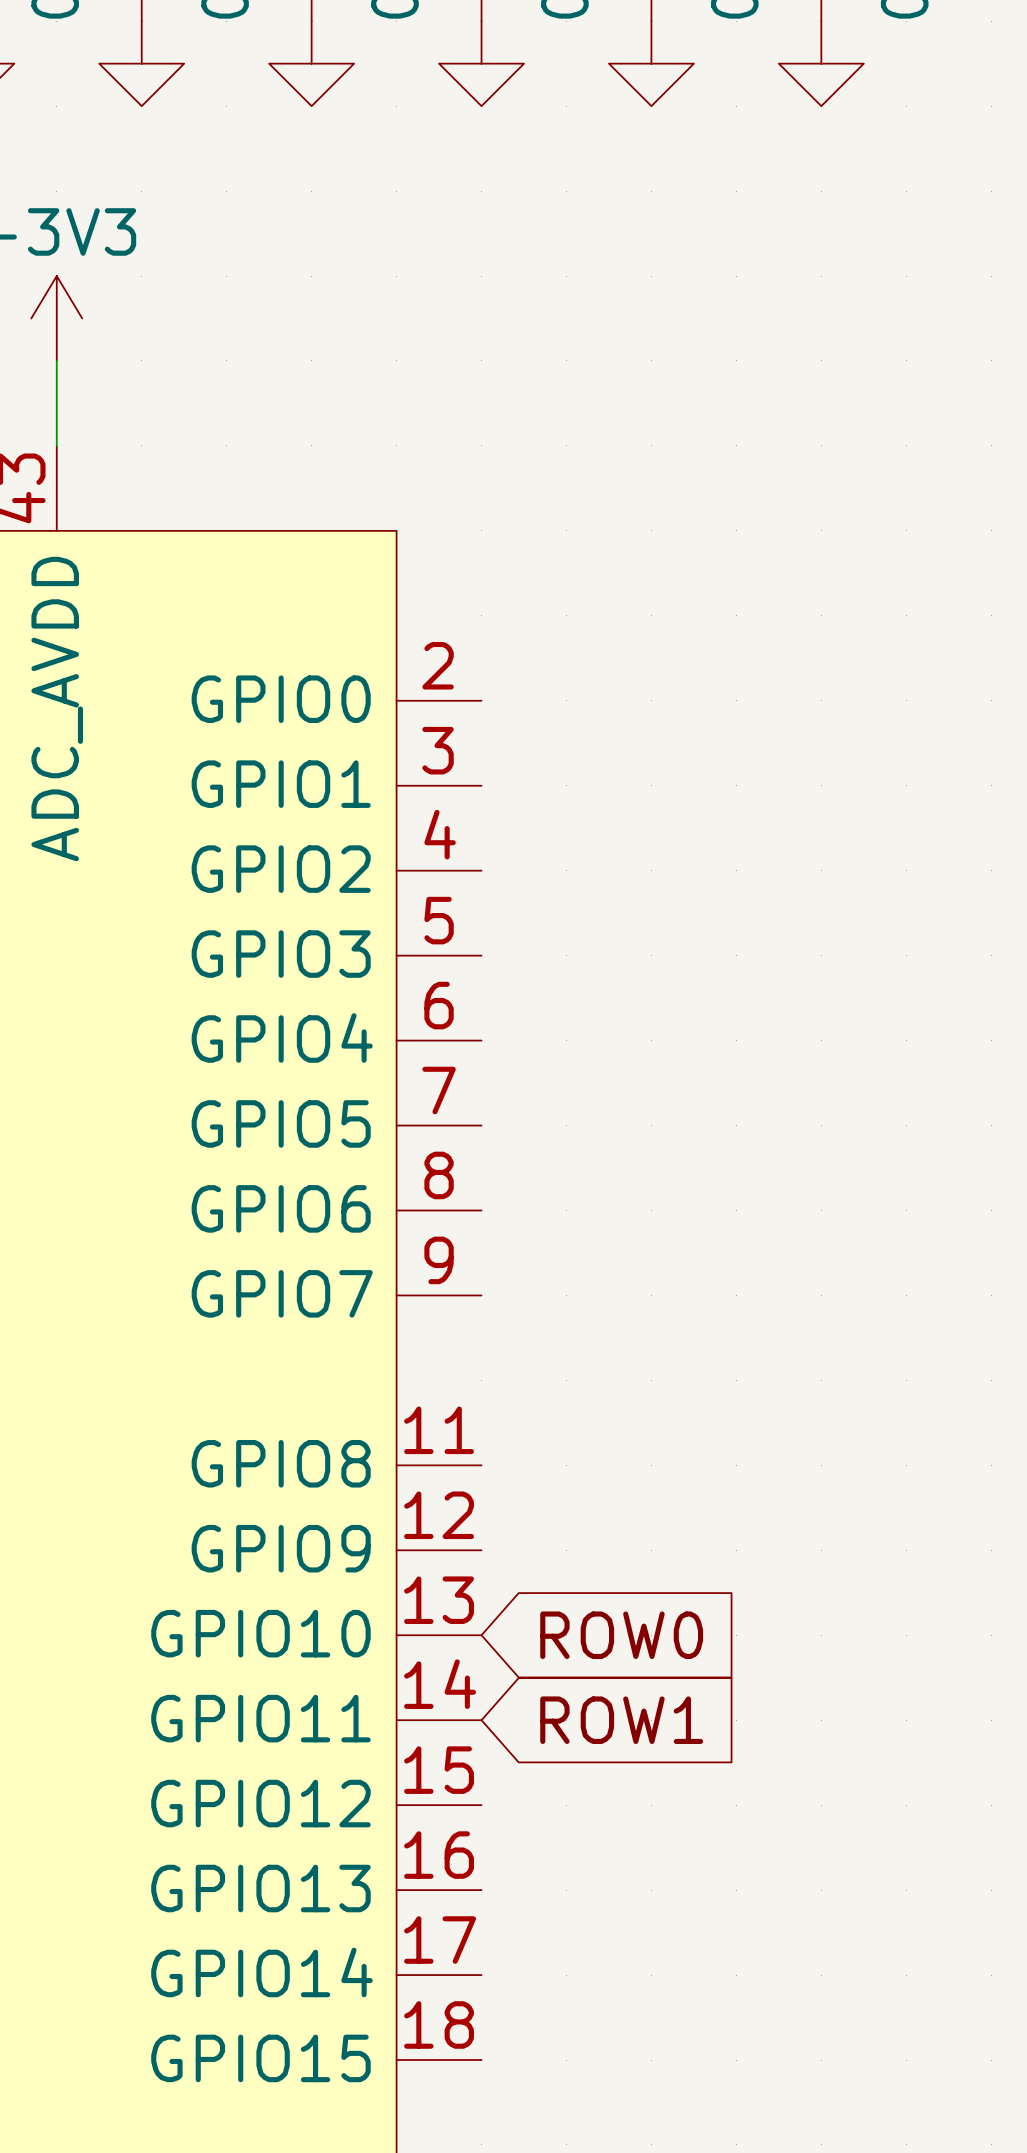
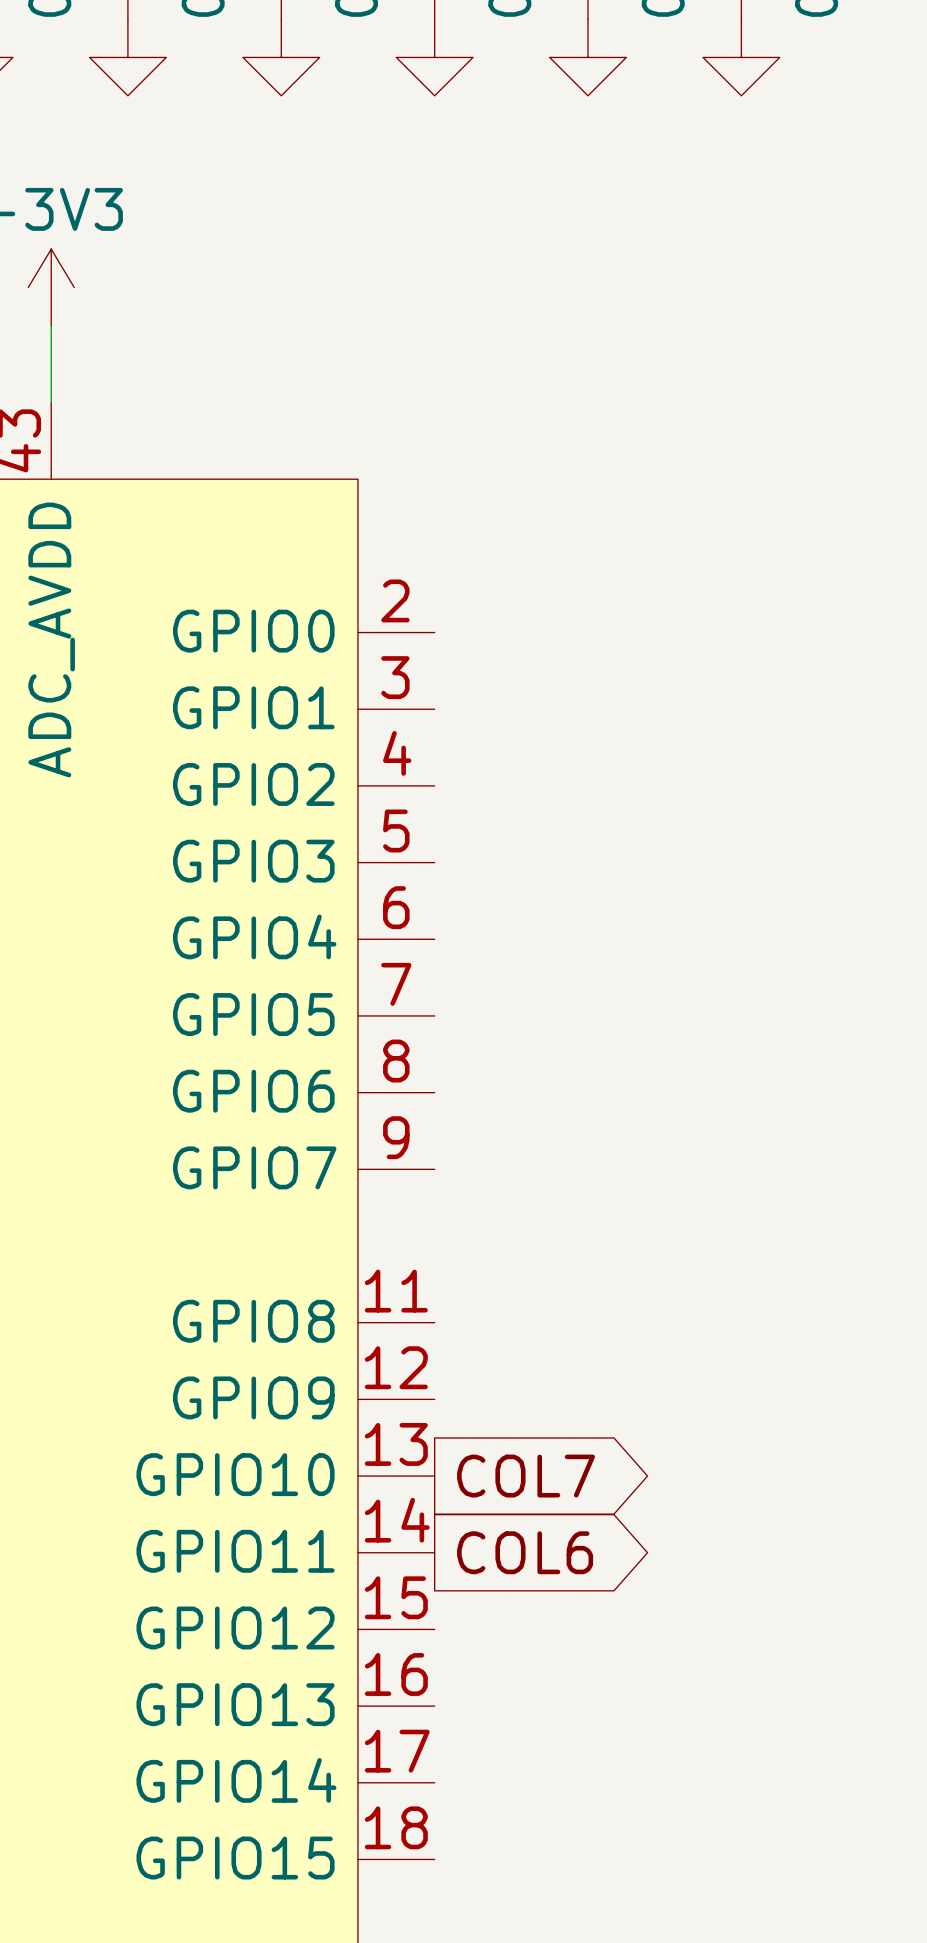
global label shape: input (621, 1635) -> output (526, 1476)
global label: ROW0 (621, 1635) -> COL7 (526, 1476)
global label shape: input (621, 1720) -> output (525, 1552)
global label: ROW1 (621, 1720) -> COL6 (525, 1552)

